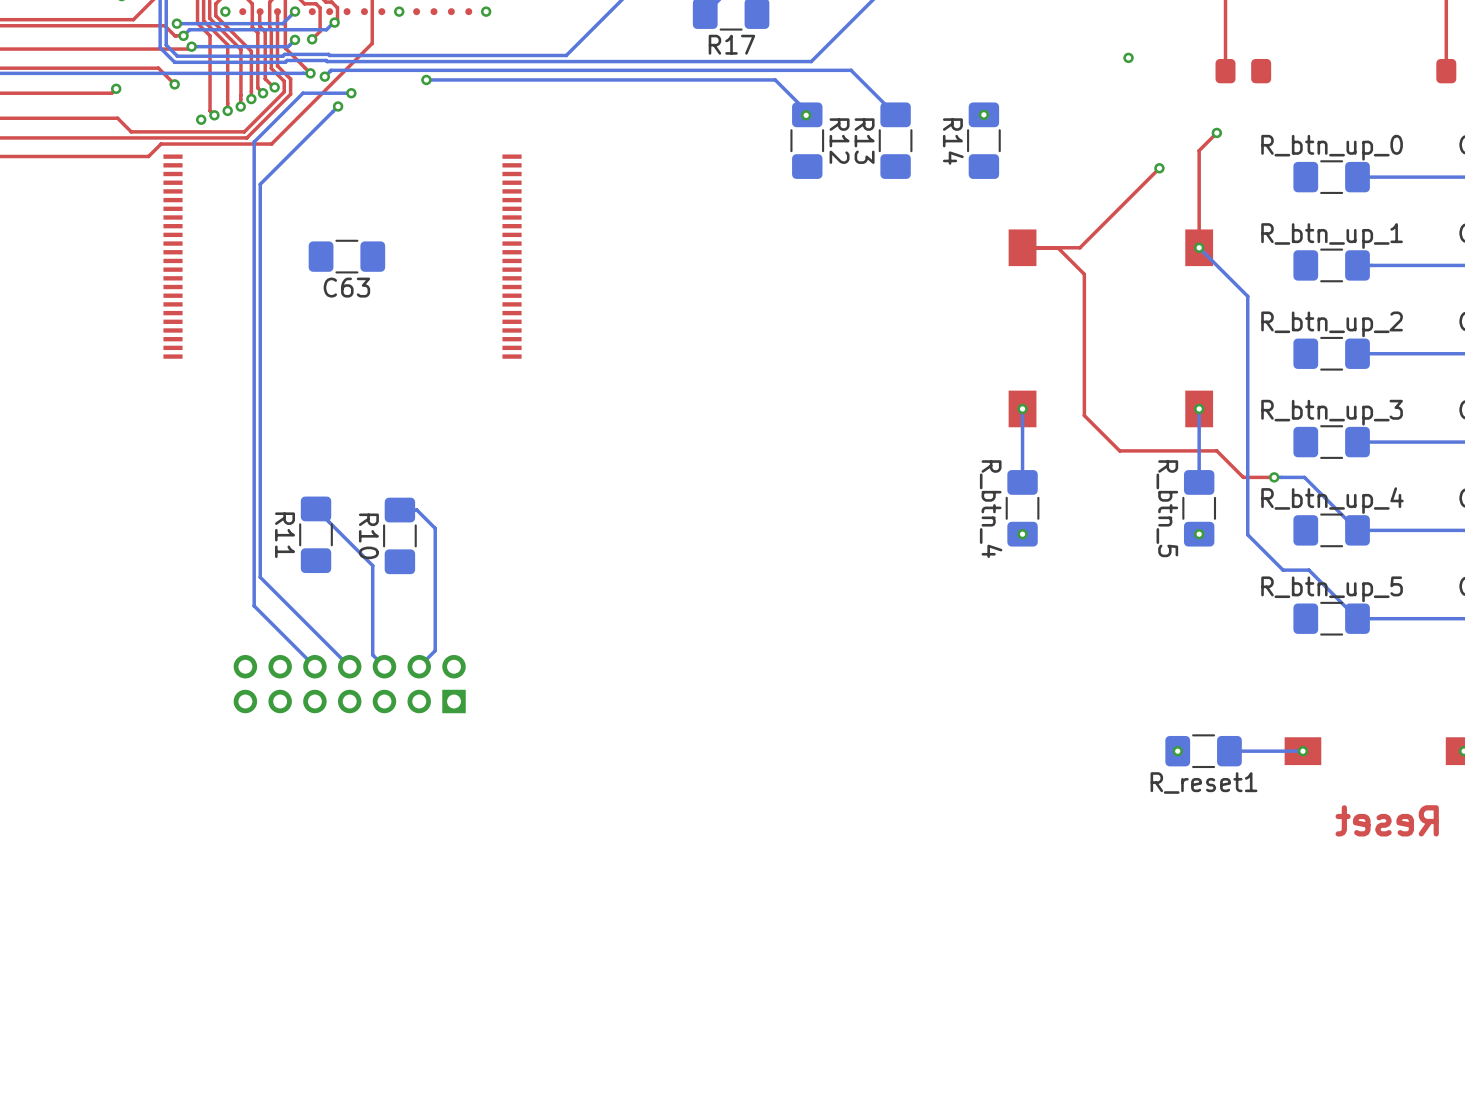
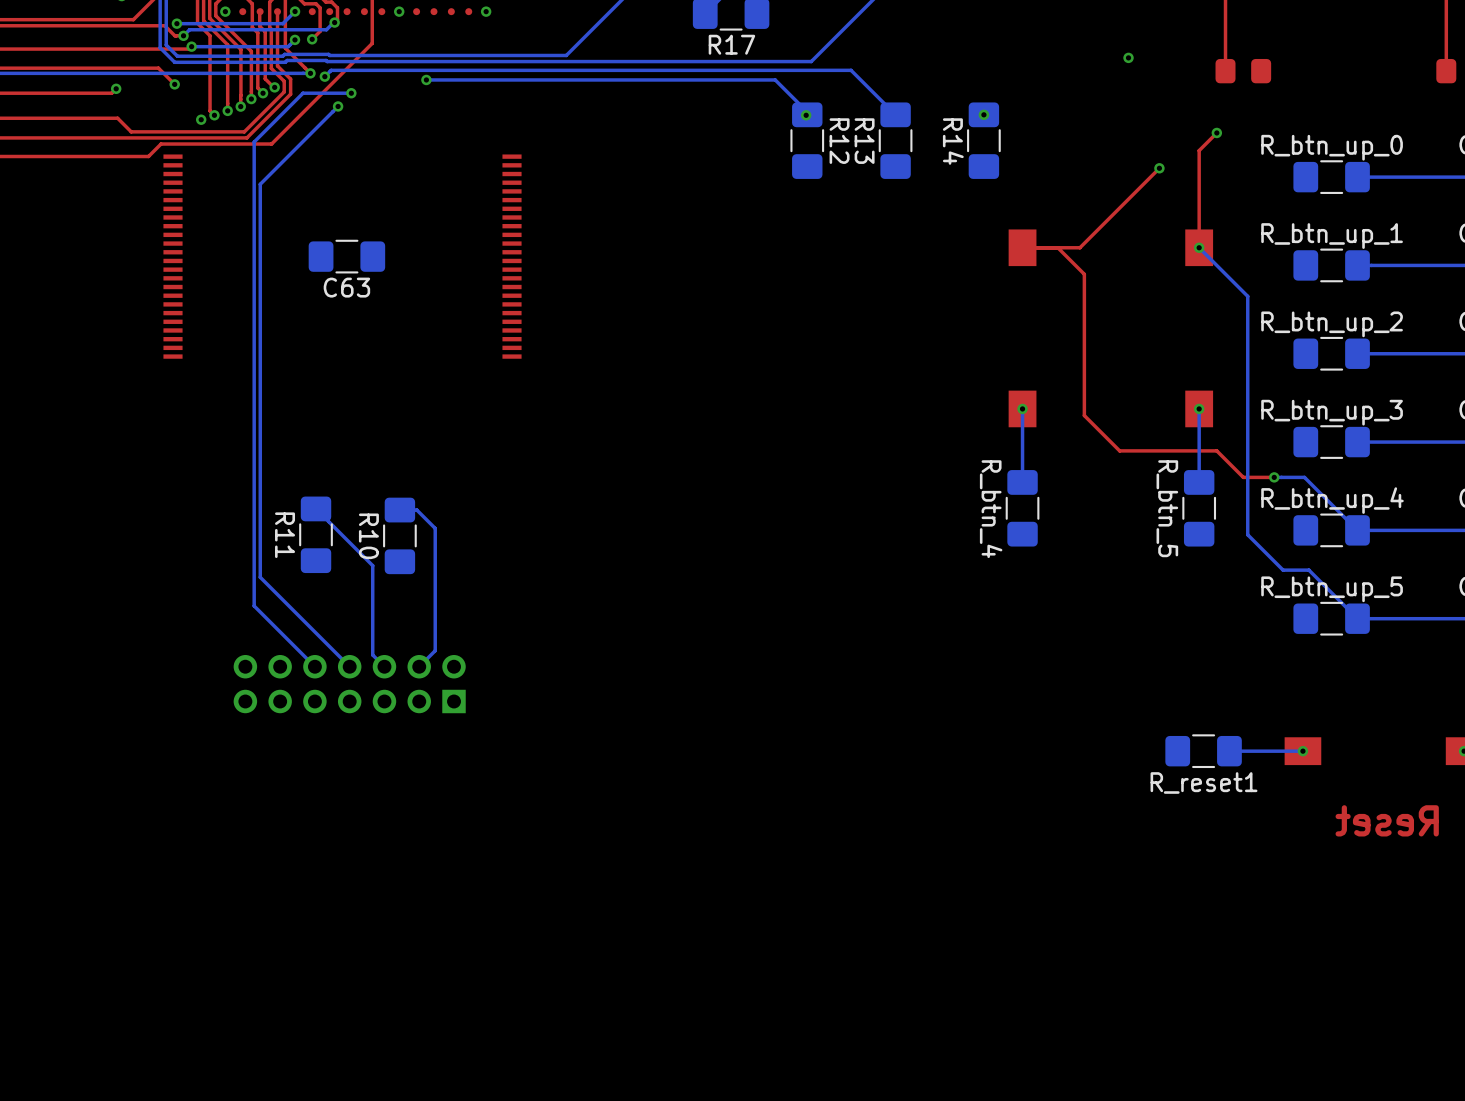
via: (1022, 534) -> none
via: (1199, 534) -> none
via: (1177, 751) -> none

